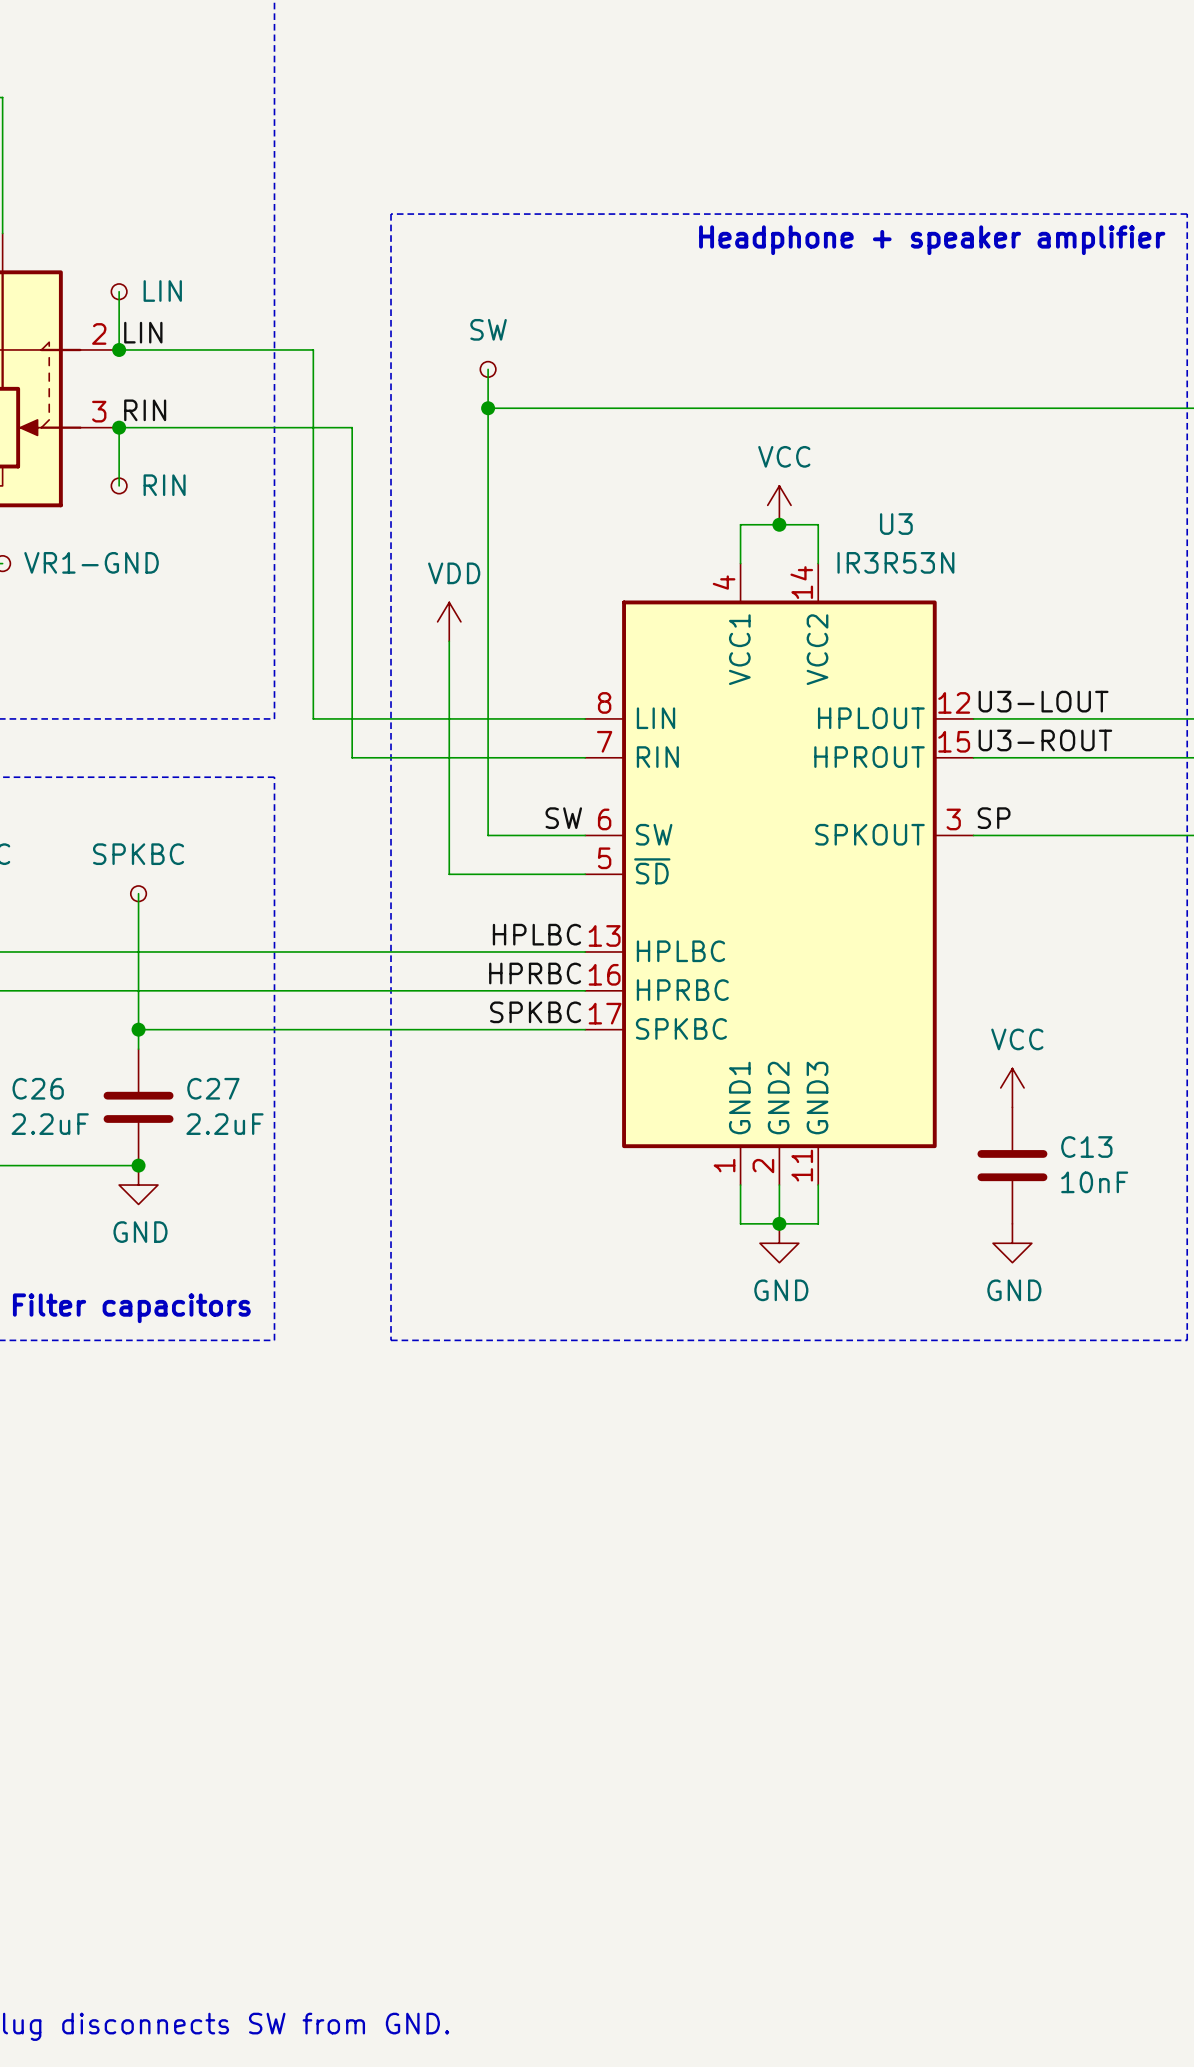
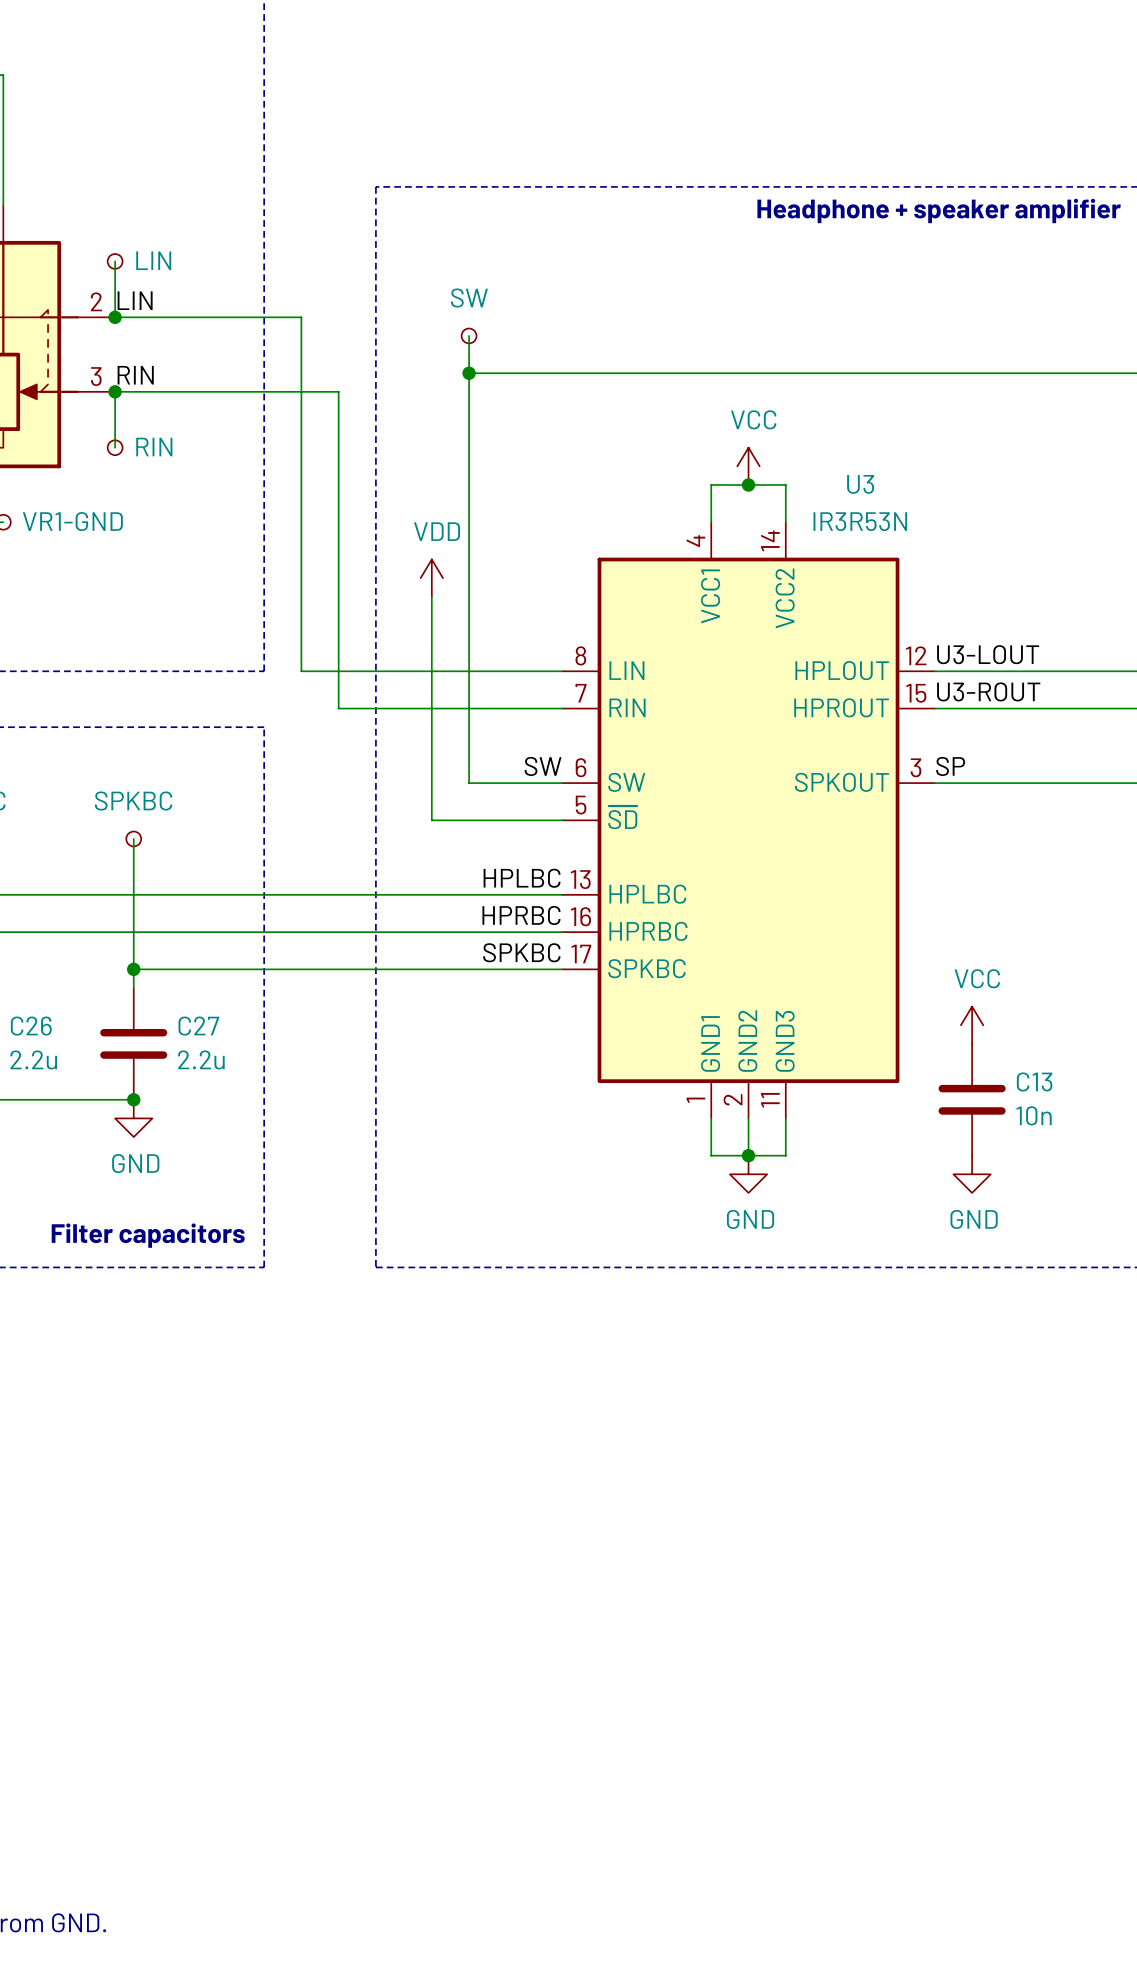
C26 value: 2.2uF (50, 1124) -> 2.2u (33, 1059)
C27 value: 2.2uF (224, 1124) -> 2.2u (201, 1059)
C13 value: 10nF (1094, 1182) -> 10n (1034, 1115)

